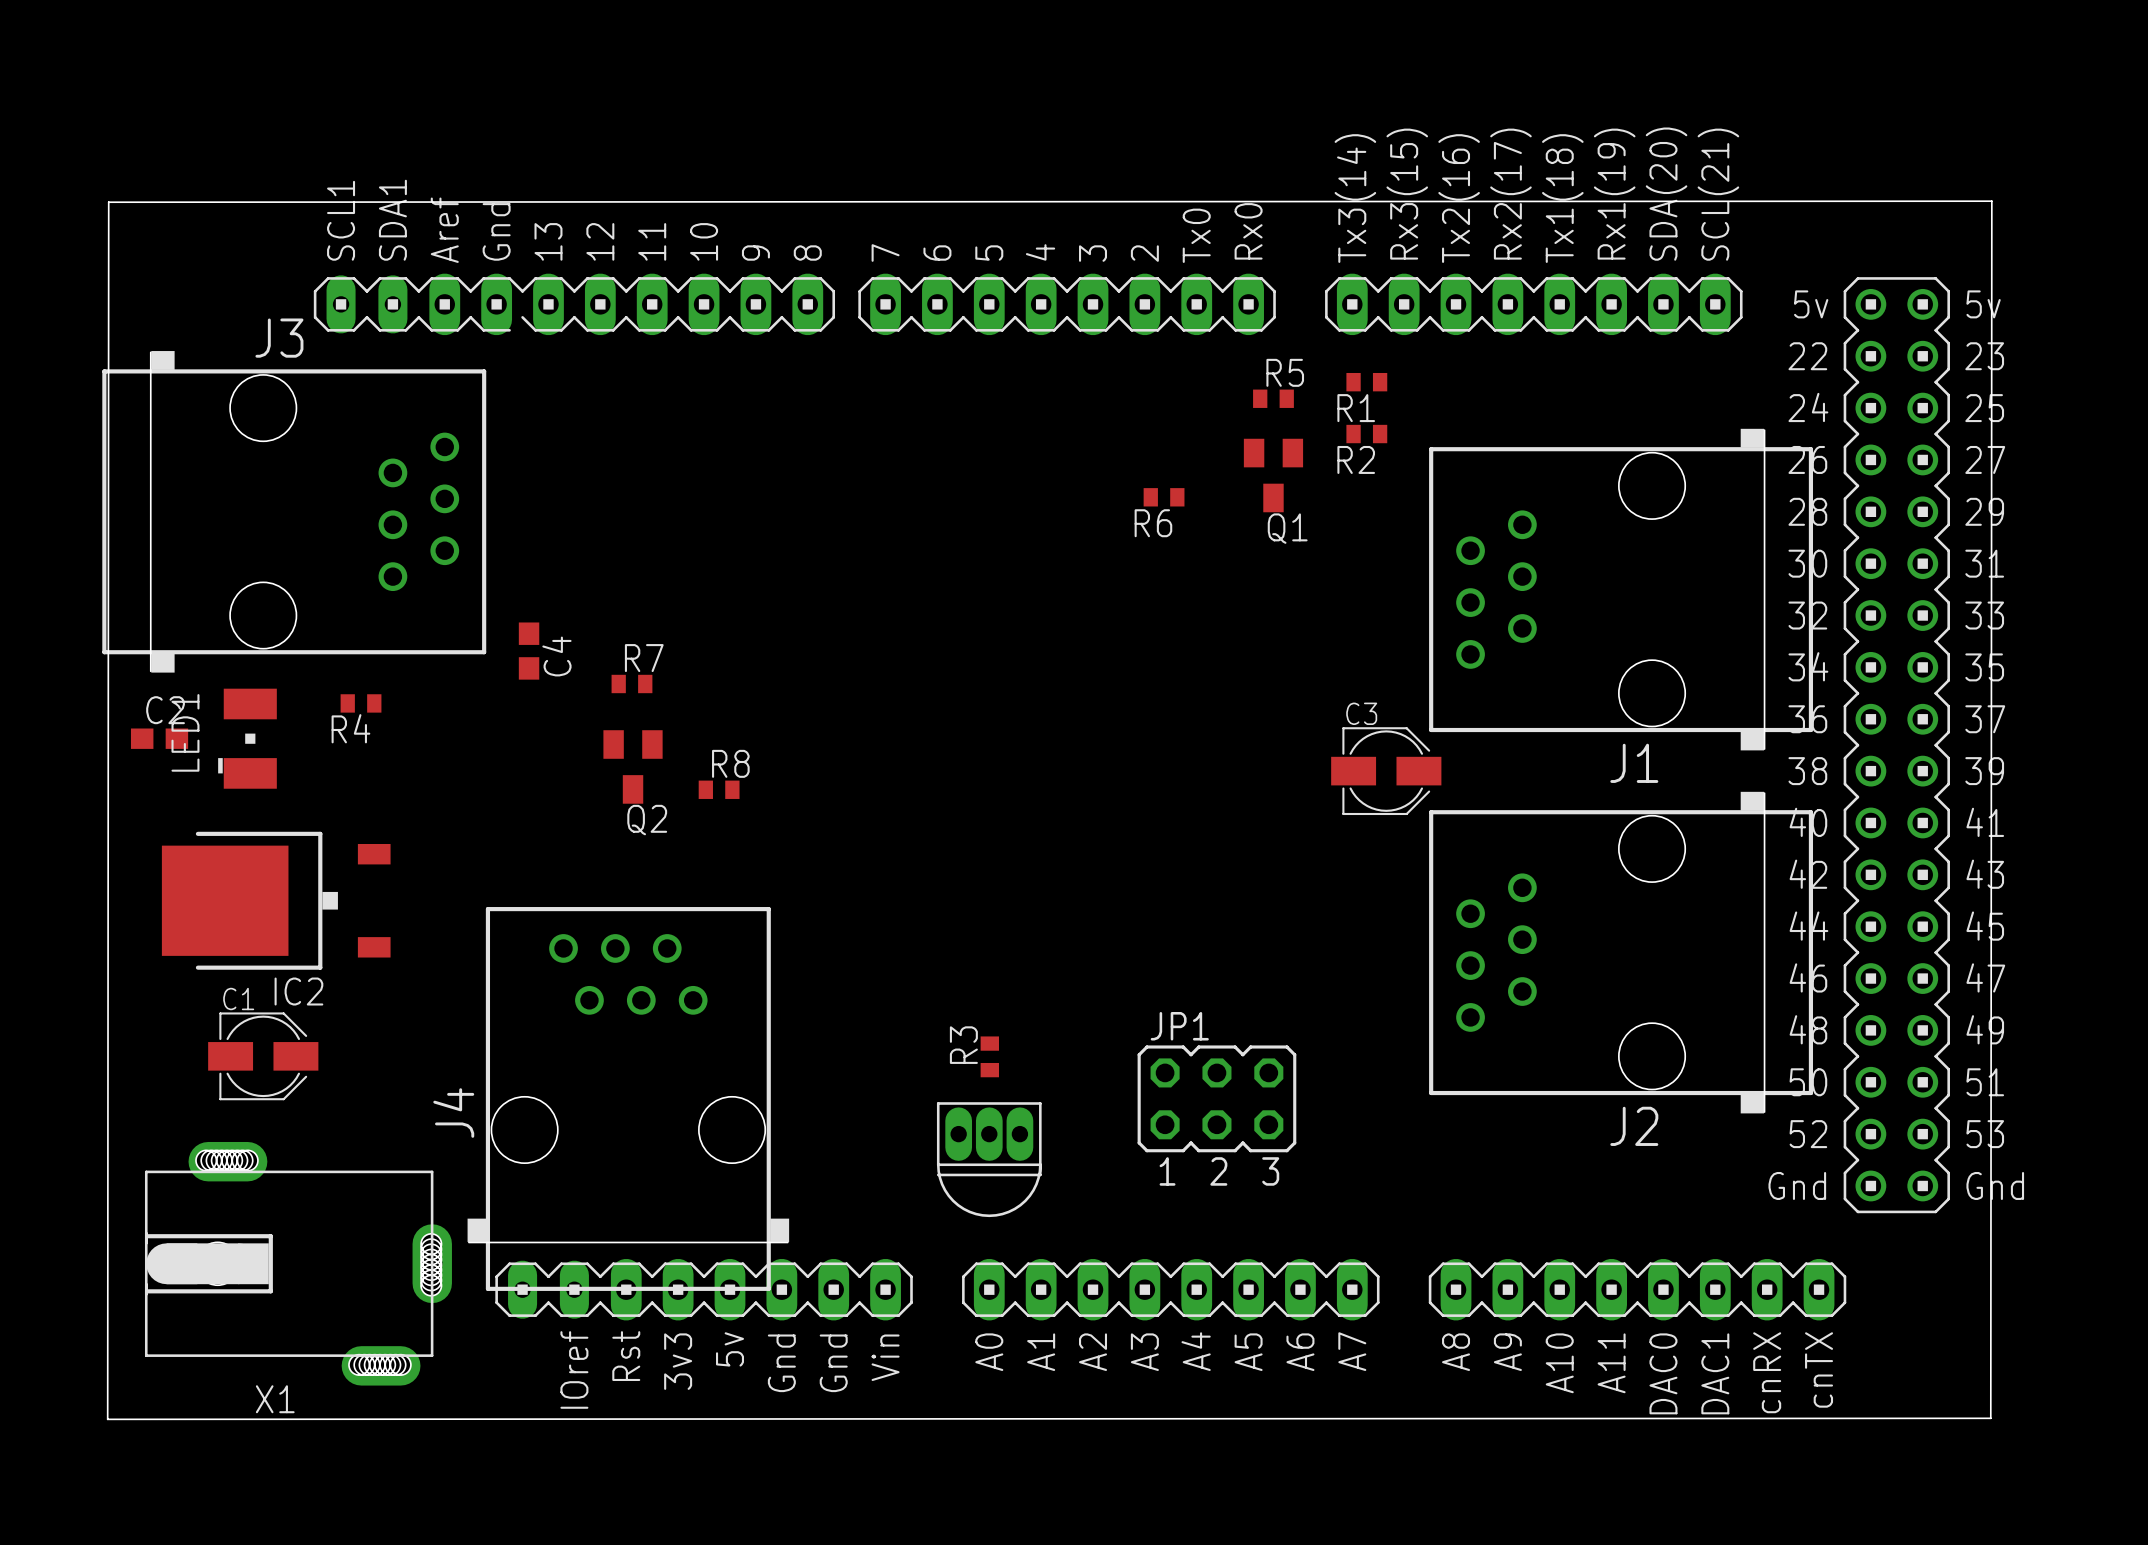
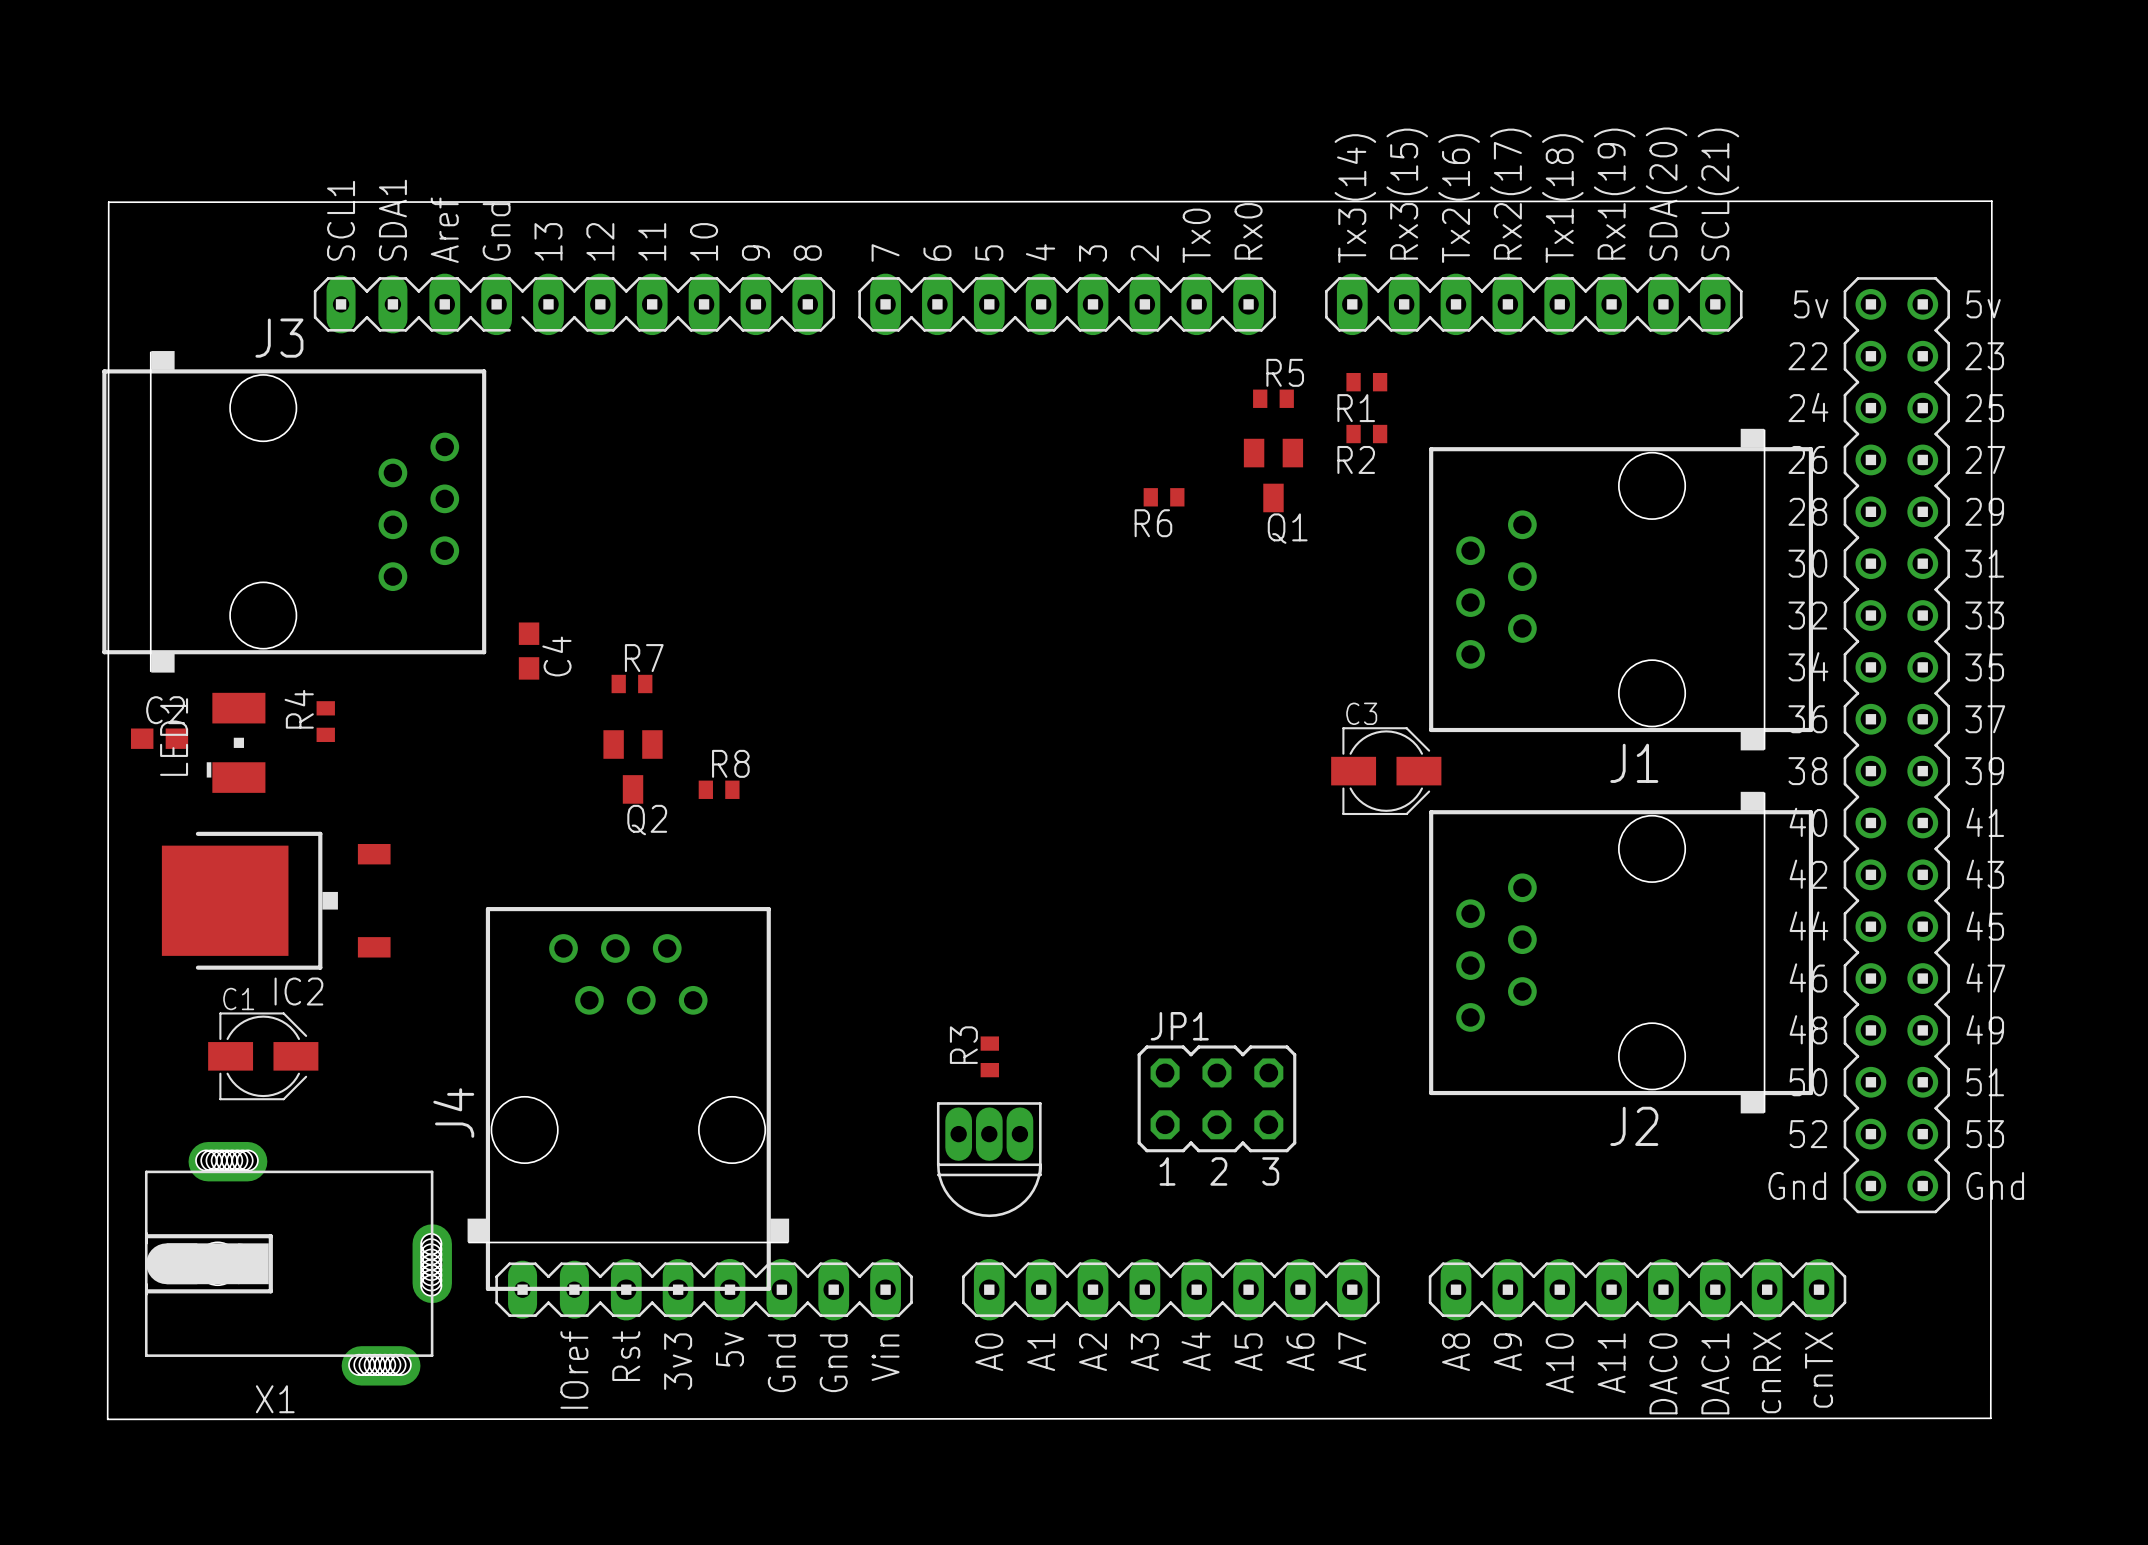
R4 rotation: 0° (361, 703) -> 90° clockwise (325, 721)
R4 position: (361, 703) -> (325, 721)
LED1 position: (247, 738) -> (236, 742)

